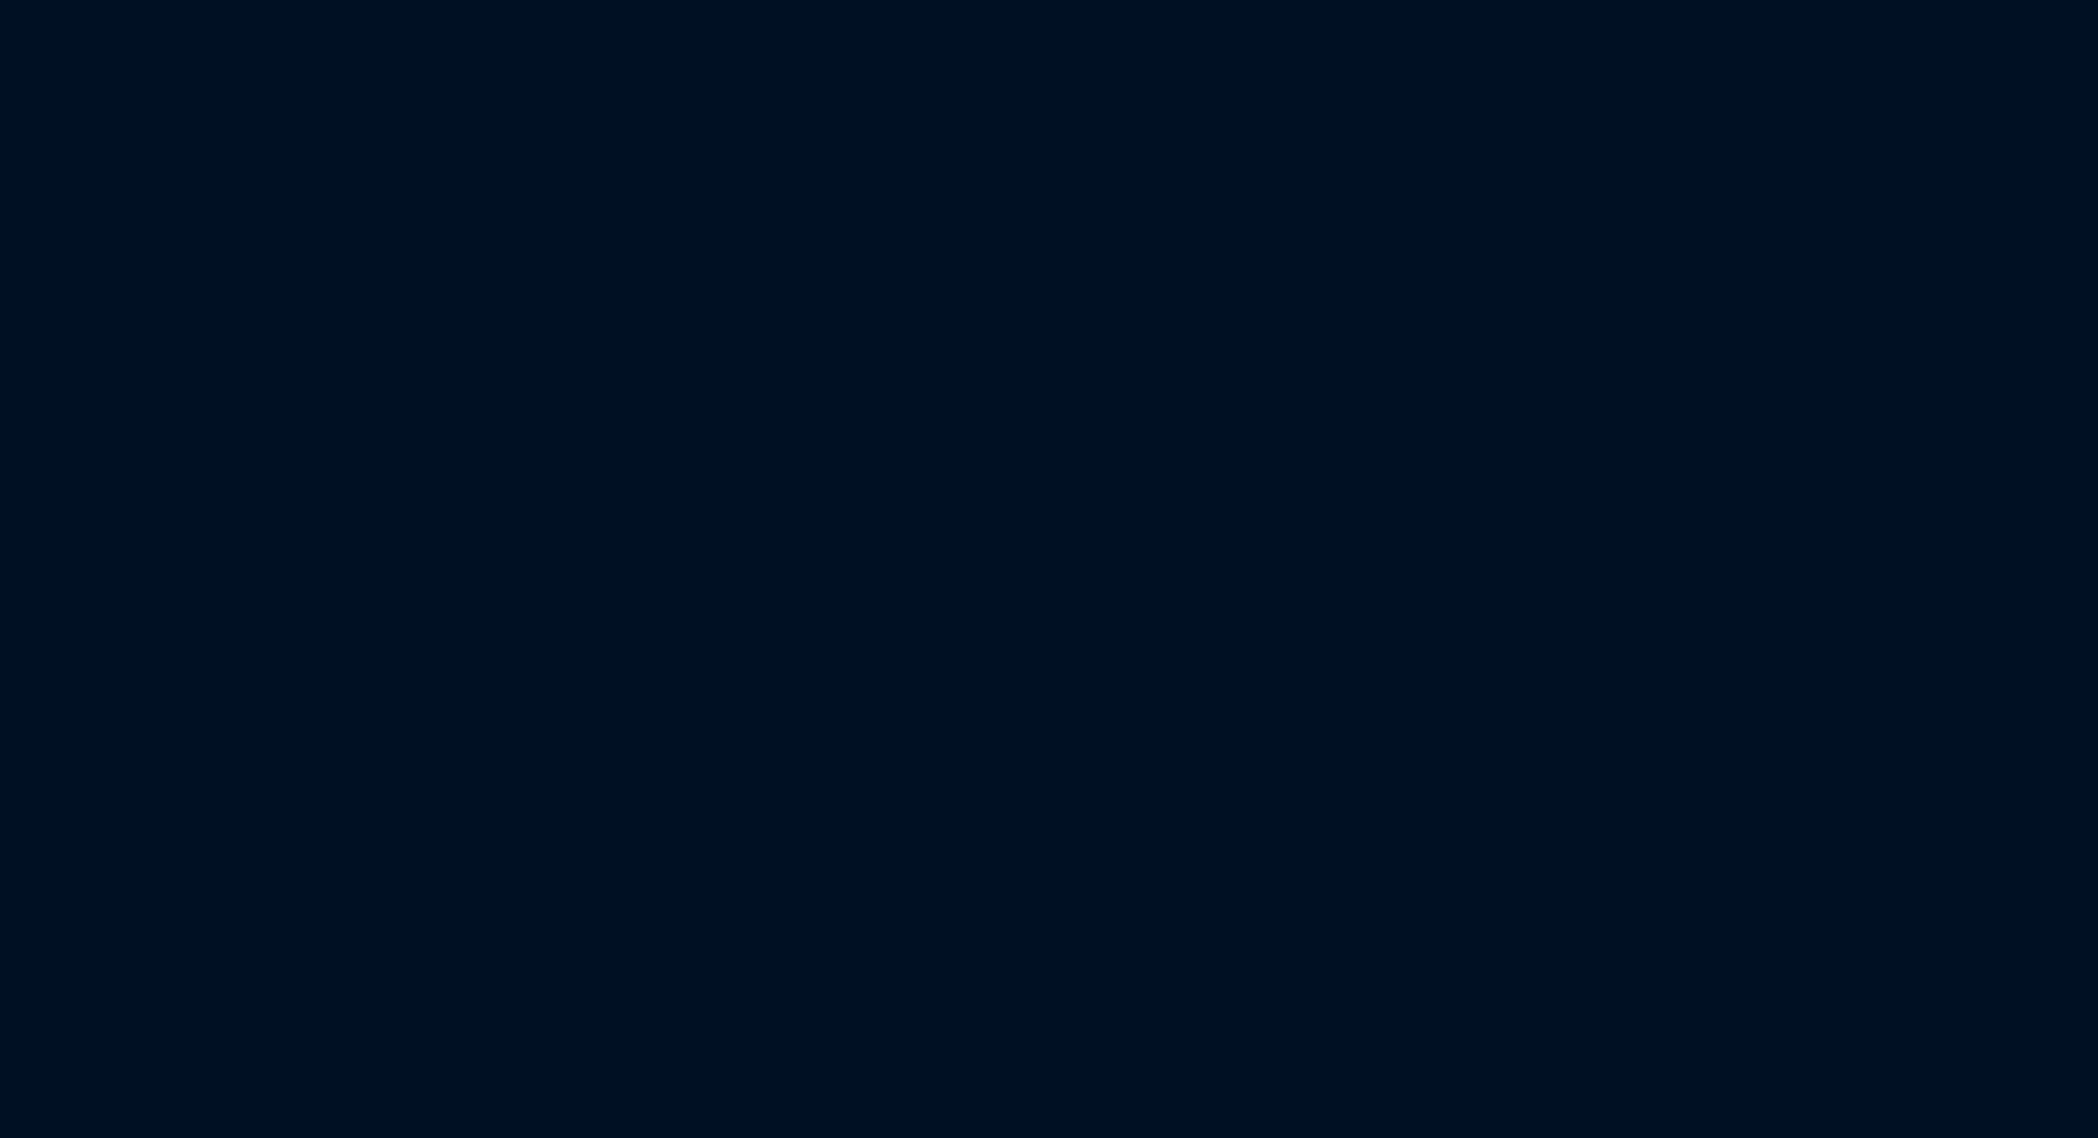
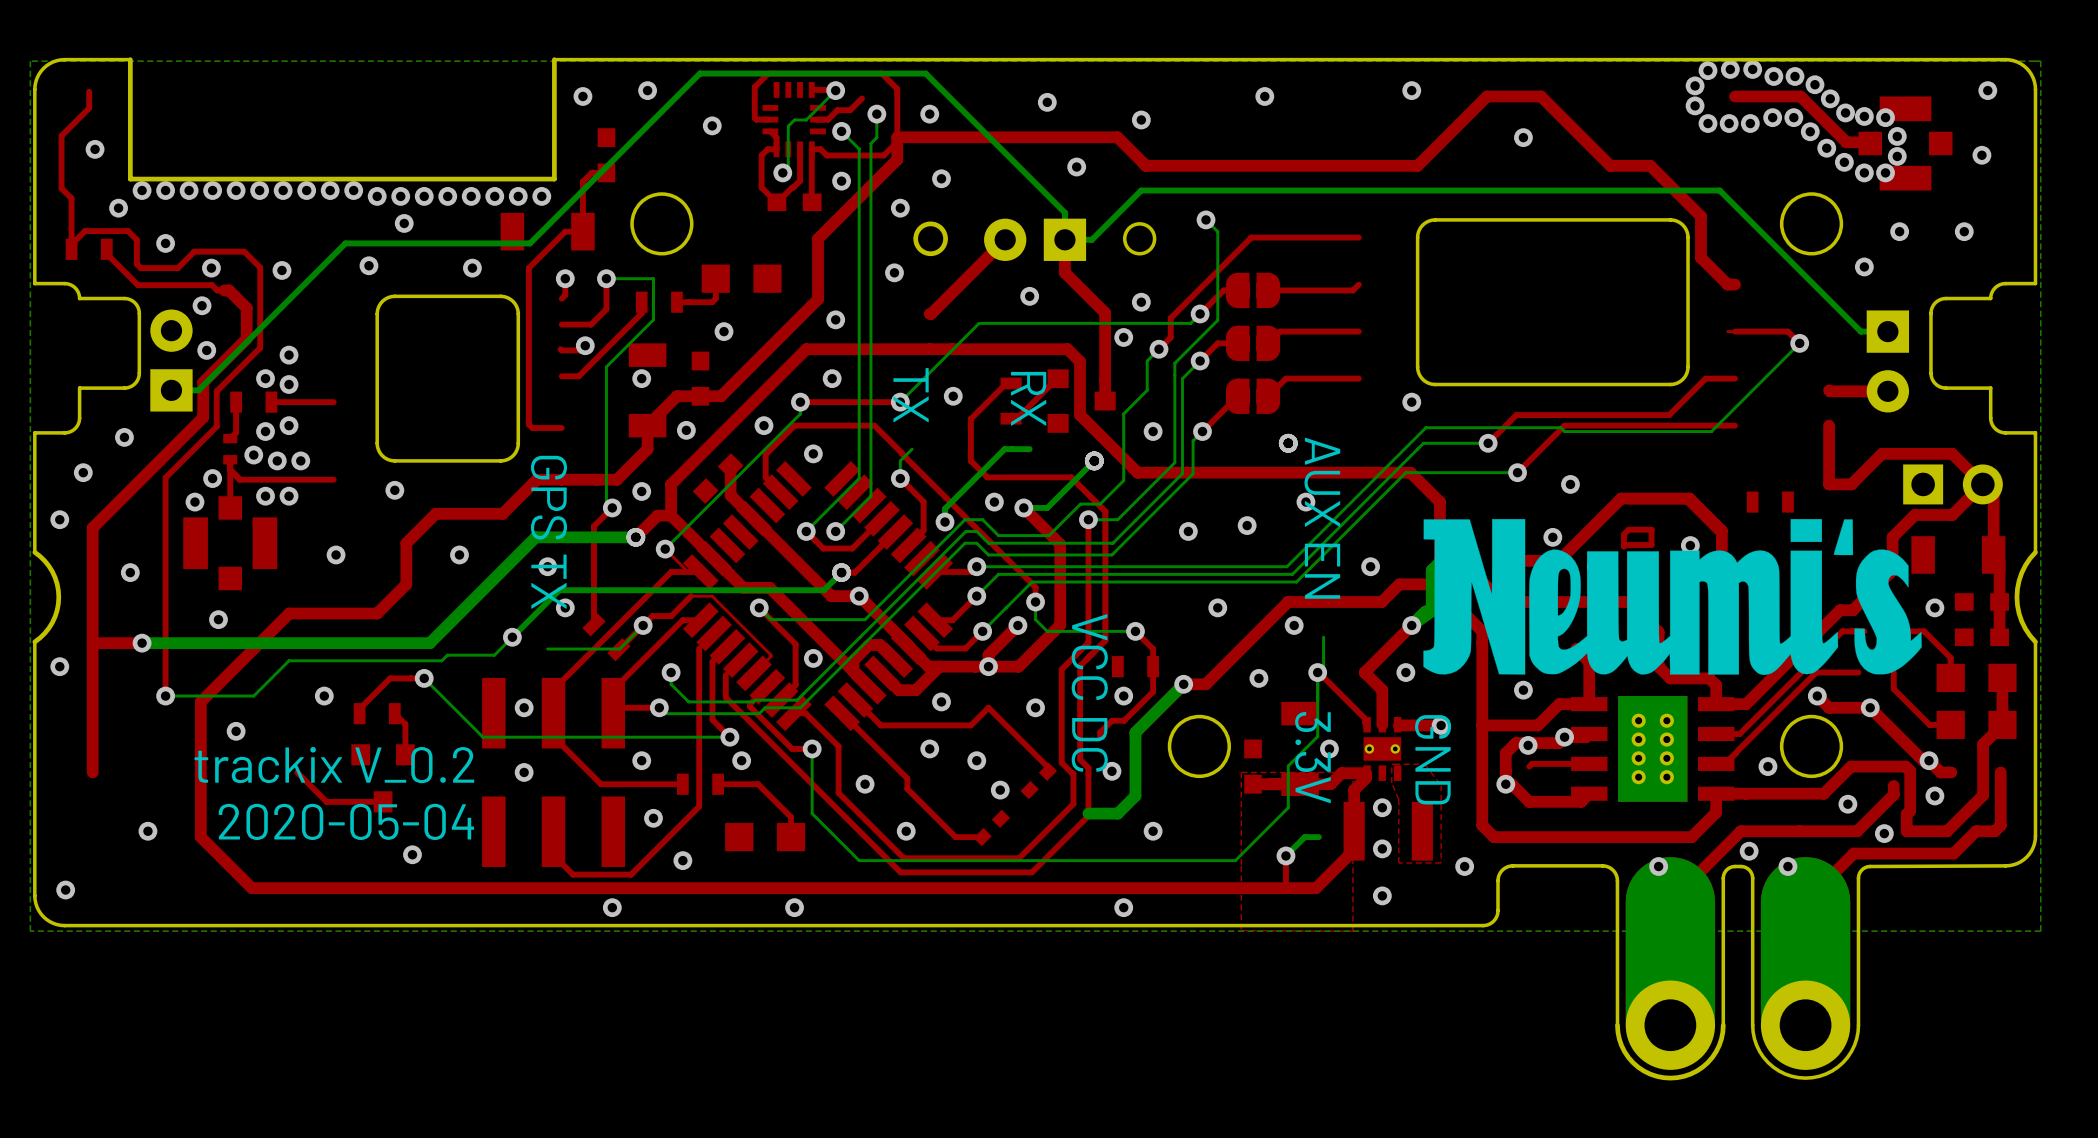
board edge: none -> (2005, 59) (554, 59) (554, 179) (130, 179) (130, 59) (64, 59) (53, 61) (40, 71) (35, 85) (34, 283) (68, 284) (76, 289) (79, 298) (124, 298) (133, 301) (139, 311) (139, 373) (136, 382) (128, 387) (79, 388) (79, 419) (76, 427) (72, 430) (64, 432) (34, 432) (34, 552) (44, 560) (52, 571) (57, 584) (58, 597) (57, 610) (52, 622) (44, 633) (34, 641) (34, 895) (37, 907) (46, 919) (56, 924) (64, 925) (1483, 925) (1490, 923) (1496, 916) (1498, 876) (1501, 871) (1507, 867) (1604, 866) (1613, 870) (1617, 878) (1617, 1025) (1619, 1038) (1628, 1057) (1638, 1067) (1656, 1076) (1670, 1078) (1684, 1076) (1702, 1067) (1712, 1057) (1719, 1045) (1723, 1025) (1723, 876) (1729, 868) (1742, 866) (1749, 869) (1752, 876) (1752, 1025) (1756, 1045) (1768, 1062) (1785, 1074) (1805, 1078) (1825, 1074) (1837, 1067) (1847, 1057) (1854, 1045) (1858, 1032) (1858, 878) (1861, 869) (1870, 866) (2009, 865) (2020, 861) (2026, 857) (2033, 847) (2035, 839) (2035, 641) (2021, 621) (2016, 597) (2021, 572) (2035, 552) (2035, 432) (2005, 432) (1998, 430) (1992, 425) (1990, 419) (1990, 388) (1942, 387) (1934, 382) (1930, 373) (1931, 311) (1936, 301) (1945, 298) (1990, 298) (1993, 289) (2001, 284) (2035, 283) (2035, 85) (2031, 74) (2026, 68) (2017, 61) (2005, 59)
bottom zone outline: none -> (2040, 61) (30, 61) (30, 931) (2040, 931) (2040, 61)
via: none -> (1730, 69)
via: none -> (1752, 69)
via: none -> (1708, 70)
via: none -> (1773, 76)
via: none -> (1795, 76)
via: none -> (1814, 84)
via: none -> (1695, 85)
top track: none -> (811, 89) (835, 90)
via: none -> (647, 90)
bottom track: none -> (835, 90) (806, 119) (794, 119) (788, 126) (788, 172)
via: none -> (835, 90)
via: none -> (1411, 90)
via: none -> (1987, 90)
top track: none -> (89, 91) (89, 108) (61, 135) (61, 188) (71, 198) (71, 249)
via: none -> (582, 96)
via: none -> (1264, 96)
top track: none -> (1764, 96) (1735, 96) (1800, 96) (1846, 142) (1870, 143)
top track: none -> (862, 98) (850, 110) (837, 110) (828, 119) (817, 119)
via: none -> (1830, 98)
via: none -> (1047, 102)
via: none -> (1695, 105)
via: none -> (1845, 112)
bottom track: none -> (876, 114) (876, 137) (870, 143) (870, 496) (835, 531)
via: none -> (876, 114)
via: none -> (929, 114)
via: none -> (1864, 116)
via: none -> (1772, 117)
via: none -> (1793, 117)
via: none -> (1885, 117)
top track: none -> (770, 119) (756, 119) (754, 117) (754, 87) (768, 73) (881, 73) (897, 89) (897, 141) (883, 155) (826, 155) (820, 149) (811, 149) (811, 202)
part: none -> (794, 119)
via: none -> (1141, 119)
via: none -> (1708, 123)
via: none -> (1729, 123)
via: none -> (1750, 123)
via: none -> (712, 125)
top track: none -> (770, 131) (776, 137) (776, 149) (767, 149) (761, 155) (761, 187) (776, 202) (800, 180) (800, 149)
bottom track: none -> (841, 131) (859, 149) (859, 478) (806, 531)
via: none -> (841, 131)
via: none -> (1810, 131)
via: none -> (1897, 136)
top track: none -> (1117, 137) (1146, 165) (1417, 165) (1486, 96) (1541, 96) (1610, 165) (1650, 165) (1700, 216) (1700, 257) (1727, 284) (1735, 284)
top track: none -> (1117, 137) (897, 137) (897, 159) (818, 238) (818, 299) (721, 396) (676, 396) (647, 425) (647, 449) (617, 479) (536, 479) (502, 513) (435, 513) (406, 543) (406, 584) (377, 613) (289, 613) (200, 701) (200, 837) (251, 888) (1316, 888) (1354, 850) (1354, 790) (1365, 778) (1365, 773) (1341, 773) (1330, 784) (1253, 784)
via: none -> (1523, 137)
part: none -> (1905, 143)
via: none -> (1826, 148)
via: none -> (95, 149)
part: none -> (606, 155)
via: none -> (1981, 155)
via: none -> (1897, 156)
via: none -> (1844, 162)
via: none -> (1076, 167)
top track: none -> (606, 172) (591, 172) (582, 181) (582, 231) (565, 231) (528, 268) (528, 424) (532, 428) (561, 428)
via: none -> (782, 172)
via: none -> (1864, 172)
via: none -> (1885, 172)
via: none -> (941, 178)
via: none -> (841, 181)
via: none -> (142, 190)
via: none -> (165, 190)
via: none -> (189, 190)
via: none -> (212, 190)
via: none -> (236, 190)
via: none -> (259, 190)
via: none -> (283, 190)
via: none -> (306, 190)
via: none -> (330, 190)
via: none -> (353, 190)
round board edge: none -> [630, 192, 694, 256]
round board edge: none -> [1779, 192, 1844, 256]
via: none -> (377, 196)
via: none -> (400, 196)
via: none -> (424, 196)
via: none -> (447, 196)
via: none -> (471, 196)
via: none -> (494, 196)
via: none -> (518, 196)
via: none -> (541, 196)
part: none -> (794, 202)
via: none -> (118, 208)
via: none -> (900, 208)
bottom track: none -> (1206, 219) (1217, 231) (1217, 320) (1174, 363) (1174, 462) (1117, 519) (1088, 519)
via: none -> (1206, 219)
board edge: none -> (1670, 219) (1435, 219) (1426, 222) (1419, 228) (1417, 237) (1417, 366) (1419, 375) (1426, 382) (1435, 384) (1670, 384) (1679, 382) (1685, 375) (1688, 366) (1688, 237) (1682, 225) (1670, 219)
round board edge: none -> [913, 221, 948, 257]
round board edge: none -> [1122, 222, 1157, 256]
via: none -> (404, 223)
part: none -> (547, 231)
via: none -> (1899, 231)
via: none -> (1964, 231)
top track: none -> (1358, 237) (1251, 237) (1170, 318) (1170, 337) (1158, 349)
top track: none -> (1005, 239) (929, 313)
part: none -> (1035, 239)
top track: none -> (1064, 239) (1064, 272) (1105, 312) (1105, 401)
via: none -> (165, 243)
top track: none -> (71, 244) (85, 231) (128, 231) (136, 239) (136, 264) (140, 268) (177, 268) (194, 251) (244, 251) (260, 267) (260, 347) (216, 391) (216, 426) (165, 477) (165, 696)
part: none -> (89, 249)
top track: none -> (106, 249) (106, 254) (137, 285) (212, 285) (217, 290) (229, 290) (246, 308) (246, 338) (203, 382) (203, 417) (92, 527) (92, 772)
via: none -> (368, 265)
via: none -> (1864, 266)
via: none -> (211, 268)
via: none -> (472, 268)
via: none -> (281, 270)
via: none -> (894, 272)
top track: none -> (565, 278) (565, 295) (561, 298)
via: none -> (565, 278)
top track: none -> (606, 278) (606, 309) (591, 324) (561, 324)
bottom track: none -> (606, 278) (653, 278) (653, 319) (606, 366) (606, 502) (612, 507)
via: none -> (606, 278)
top track: none -> (715, 278) (715, 298) (712, 302) (676, 302)
part: none -> (741, 278)
top track: none -> (1358, 284) (1352, 290) (1268, 290)
top track: none -> (1237, 290) (1223, 290) (1200, 313)
part: none -> (1253, 290)
board edge: none -> (500, 296) (394, 296) (388, 297) (380, 303) (377, 313) (377, 443) (379, 452) (384, 457) (394, 460) (500, 460) (507, 459) (514, 454) (518, 443) (518, 311) (511, 299) (500, 296)
via: none -> (1029, 296)
top track: none -> (641, 302) (641, 313) (578, 376) (561, 376)
part: none -> (659, 302)
via: none -> (1141, 302)
via: none -> (202, 305)
bottom track: none -> (1200, 313) (1190, 323) (979, 323) (900, 402)
via: none -> (1200, 313)
via: none -> (835, 319)
via: none -> (724, 331)
top track: none -> (1358, 331) (1280, 331) (1268, 343)
top track: none -> (1727, 331) (1787, 331) (1799, 343)
bottom track: none -> (1887, 331) (1860, 331) (1719, 190) (1141, 190) (1091, 239) (1064, 239) (1064, 212) (925, 73) (699, 73) (530, 243) (345, 243) (198, 390) (171, 390)
via: none -> (1123, 337)
top track: none -> (1237, 343) (1217, 343) (1200, 360)
part: none -> (1253, 343)
bottom track: none -> (1799, 343) (1711, 431) (1564, 431) (1560, 427) (1425, 427) (1286, 566) (976, 566)
via: none -> (1799, 343)
top track: none -> (585, 345) (580, 350) (560, 349)
via: none -> (585, 345)
bottom track: none -> (1158, 349) (1147, 360) (1147, 390) (1123, 413) (1123, 480) (1100, 504) (1080, 504) (1049, 535) (998, 535) (982, 519) (965, 519) (865, 619) (771, 619) (759, 607)
via: none -> (1158, 349)
via: none -> (206, 350)
via: none -> (289, 355)
part: none -> (171, 360)
bottom track: none -> (1200, 360) (1182, 378) (1182, 473) (1112, 543) (988, 543) (976, 531) (965, 531) (797, 700) (688, 701) (671, 684) (671, 672)
via: none -> (1200, 360)
part: none -> (1887, 361)
via: none -> (265, 378)
via: none -> (641, 378)
part: none -> (700, 378)
via: none -> (832, 378)
top track: none -> (1058, 378) (1016, 418) (1011, 418)
top track: none -> (1358, 378) (1285, 378) (1268, 396)
top track: none -> (1735, 378) (1705, 378) (1669, 415) (1516, 415) (1488, 443)
top track: none -> (1011, 383) (1006, 383) (970, 418) (970, 460) (987, 477)
via: none -> (289, 384)
part: none -> (647, 390)
top track: none -> (1829, 390) (1887, 391)
text: none -> TX (911, 395)
via: none -> (953, 396)
top track: none -> (1237, 396) (1202, 431)
part: none -> (1253, 396)
text: none -> RX (1028, 398)
part: none -> (1011, 401)
part: none -> (1081, 401)
top track: none -> (236, 402) (236, 432) (230, 438)
part: none -> (253, 402)
top track: none -> (333, 402) (271, 402)
bottom track: none -> (800, 402) (800, 413) (665, 549)
via: none -> (800, 402)
top track: none -> (900, 402) (800, 402)
via: none -> (900, 402)
via: none -> (1411, 402)
via: none -> (289, 425)
via: none -> (763, 425)
top track: none -> (1735, 425) (1564, 425) (1517, 472)
top track: none -> (1829, 425) (1829, 484) (1851, 484) (1881, 453) (1952, 453) (1993, 495) (1993, 554) (1999, 560) (1999, 637)
via: none -> (686, 430)
via: none -> (265, 431)
via: none -> (1153, 431)
bottom track: none -> (1202, 431) (1193, 440) (1193, 473) (1111, 554) (988, 554) (976, 543) (965, 543) (800, 707) (765, 707) (759, 713) (665, 713) (659, 707)
via: none -> (1202, 431)
via: none -> (124, 437)
via: none -> (1288, 443)
bottom track: none -> (1488, 443) (1423, 443) (1292, 574) (998, 574) (976, 596)
via: none -> (1488, 443)
part: none -> (230, 449)
bottom track: none -> (912, 449) (900, 460) (900, 478)
bottom track: none -> (1029, 449) (1004, 449) (945, 508) (945, 522)
via: none -> (813, 453)
via: none -> (253, 455)
top track: none -> (230, 459) (230, 507) (230, 459)
via: none -> (277, 460)
via: none -> (300, 460)
bottom track: none -> (1094, 460) (1047, 507) (1023, 507)
via: none -> (1094, 460)
top track: none -> (730, 466) (730, 495) (831, 596) (859, 596) (928, 666) (1018, 666) (1060, 625) (1060, 544) (1023, 507)
top track: none -> (230, 467) (242, 479) (333, 479) (239, 479) (230, 470)
via: none -> (83, 472)
bottom track: none -> (1517, 472) (1405, 472) (1296, 582) (1032, 582) (982, 631)
via: none -> (1517, 472)
top track: none -> (987, 477) (1071, 477) (1105, 511) (1105, 640) (1080, 665)
via: none -> (212, 478)
part: none -> (718, 478)
top track: none -> (900, 478) (923, 501) (923, 530) (908, 545)
via: none -> (900, 478)
via: none -> (1570, 484)
part: none -> (1953, 484)
top track: none -> (1982, 484) (1952, 515) (1914, 515) (1892, 537) (1892, 570) (1852, 610) (1840, 610) (1746, 704) (1716, 704) (1716, 685) (1709, 678) (1670, 678) (1658, 666) (1658, 631) (1628, 602) (1502, 602) (1461, 560) (1439, 560) (1439, 502) (1410, 472) (1137, 472) (1079, 414) (1079, 361) (1067, 349) (806, 349) (671, 484) (671, 515)
via: none -> (394, 490)
via: none -> (641, 491)
top track: none -> (780, 492) (765, 477) (765, 454) (794, 425) (874, 425) (1035, 587) (1035, 602)
via: none -> (265, 496)
via: none -> (289, 496)
top track: none -> (1628, 501) (1686, 501) (1721, 536) (1721, 550) (1721, 530) (1689, 498) (1621, 498) (1558, 560) (1512, 560)
via: none -> (194, 502)
via: none -> (994, 502)
via: none -> (1305, 502)
part: none -> (1770, 502)
via: none -> (612, 507)
via: none -> (1023, 507)
top track: none -> (612, 513) (612, 507) (593, 526) (593, 624)
top track: none -> (671, 515) (657, 515) (635, 537)
top track: none -> (671, 515) (743, 587) (769, 587) (868, 686)
top track: none -> (882, 518) (852, 548) (823, 548) (806, 531) (806, 537)
text: none -> AUX EN (1322, 518)
via: none -> (59, 519)
top track: none -> (1088, 519) (1088, 642) (1061, 669) (1061, 762) (1073, 773) (1073, 803) (1019, 858) (903, 858) (838, 793) (838, 746) (805, 713) (793, 713)
via: none -> (1088, 519)
drawing: none -> [1423, 519, 1922, 676]
via: none -> (945, 522)
via: none -> (1247, 525)
top track: none -> (1651, 529) (1628, 529) (1623, 534) (1623, 546) (1651, 544) (1651, 529)
via: none -> (806, 531)
via: none -> (835, 531)
via: none -> (1188, 531)
text: none -> GPS TX (548, 532)
top track: none -> (895, 532) (854, 572) (841, 572)
bottom track: none -> (635, 537) (535, 537) (429, 643) (142, 643)
via: none -> (635, 537)
via: none -> (1552, 537)
part: none -> (230, 543)
via: none -> (1690, 545)
top track: none -> (665, 549) (688, 572) (700, 572) (671, 572) (553, 689) (553, 736) (601, 784) (682, 784)
via: none -> (665, 549)
via: none -> (336, 554)
via: none -> (459, 554)
part: none -> (1958, 554)
bottom track: none -> (1441, 560) (1431, 570) (1431, 611) (1411, 625) (1425, 611)
via: none -> (547, 566)
top track: none -> (976, 566) (971, 572) (935, 572)
via: none -> (976, 566)
via: none -> (1370, 566)
via: none -> (130, 572)
bottom track: none -> (841, 572) (823, 590) (559, 590) (494, 655) (447, 655) (441, 660) (289, 660) (253, 696) (165, 696)
via: none -> (841, 572)
part: none -> (818, 596)
via: none -> (859, 596)
top track: none -> (970, 596) (976, 596) (952, 620) (935, 620)
via: none -> (976, 596)
bottom track: none -> (1035, 602) (1035, 619) (1047, 631) (1135, 631)
via: none -> (1035, 602)
part: none -> (1981, 602)
via: none -> (565, 607)
top track: none -> (759, 607) (795, 644) (795, 685) (780, 700)
via: none -> (759, 607)
via: none -> (1217, 607)
via: none -> (1934, 607)
via: none -> (218, 619)
top track: none -> (700, 620) (682, 620) (613, 689) (613, 713) (618, 707) (659, 707)
bottom track: none -> (643, 625) (619, 649) (547, 649)
via: none -> (643, 625)
top track: none -> (1017, 625) (988, 654) (988, 666)
via: none -> (1017, 625)
via: none -> (1294, 625)
top track: none -> (1411, 625) (1364, 672) (1382, 690) (1382, 724)
via: none -> (1411, 625)
top track: none -> (982, 631) (965, 648) (936, 648) (921, 633)
via: none -> (982, 631)
top track: none -> (1135, 631) (1153, 649) (1153, 691) (1124, 720) (1111, 720) (1100, 732) (1100, 737)
via: none -> (1135, 631)
top track: none -> (1864, 631) (1842, 631) (1739, 734) (1716, 734)
top track: none -> (1899, 631) (1924, 631) (1950, 657) (1950, 677)
via: none -> (512, 637)
part: none -> (606, 637)
bottom track: none -> (1323, 637) (1323, 666) (1317, 672) (1317, 736) (1288, 765) (1288, 807) (1235, 860) (859, 860) (812, 813) (812, 748)
part: none -> (1981, 637)
top track: none -> (142, 643) (92, 643)
via: none -> (142, 643)
top track: none -> (727, 646) (712, 661) (712, 719) (729, 737)
top track: none -> (699, 648) (699, 806) (631, 874) (572, 874) (553, 855) (553, 831)
top track: none -> (618, 649) (652, 616) (671, 616) (691, 596) (712, 596) (771, 655) (754, 673)
top track: none -> (1629, 649) (1576, 649) (1589, 661) (1589, 704) (1559, 704) (1538, 725) (1482, 725)
via: none -> (813, 658)
top track: none -> (740, 660) (725, 675) (725, 697) (900, 872) (1032, 872) (1088, 815) (1088, 767) (1080, 759) (1080, 665)
top track: none -> (895, 660) (880, 644) (868, 644) (853, 660) (853, 671)
via: none -> (59, 666)
top track: none -> (939, 666) (916, 690) (898, 690) (882, 673)
via: none -> (988, 666)
part: none -> (1135, 666)
via: none -> (671, 672)
top track: none -> (1317, 672) (1367, 720) (1367, 724) (1364, 722)
via: none -> (1317, 672)
via: none -> (1405, 672)
top track: none -> (1858, 672) (1816, 672) (1724, 763) (1716, 763) (1727, 763) (1737, 753) (1737, 749) (1814, 672) (1852, 672)
top track: none -> (1893, 672) (1893, 688) (1929, 724) (1950, 724)
part: none -> (1976, 677)
top track: none -> (2002, 677) (2002, 724) (1983, 744) (1983, 795) (1947, 831) (1906, 831) (1906, 814) (1910, 810) (1910, 771) (1905, 766) (1851, 766) (1823, 793) (1716, 793) (1716, 812) (1691, 837) (1494, 837) (1482, 825)
top track: none -> (424, 678) (390, 678) (359, 708) (359, 713)
bottom track: none -> (424, 678) (483, 737) (729, 737)
via: none -> (424, 678)
via: none -> (1258, 678)
bottom track: none -> (1183, 684) (1135, 732) (1135, 795) (1117, 813) (1088, 813)
via: none -> (1183, 684)
top track: none -> (767, 686) (749, 704) (749, 706) (792, 748) (812, 748)
via: none -> (1523, 690)
text: none -> VCC DC (1089, 692)
via: none -> (165, 696)
via: none -> (324, 696)
via: none -> (1123, 696)
top track: none -> (1817, 696) (1829, 707) (1870, 707) (1923, 760) (1929, 760) (1940, 772) (1951, 772)
via: none -> (1817, 696)
top track: none -> (855, 700) (880, 725) (970, 725) (988, 707) (1047, 767) (1047, 771)
via: none -> (941, 701)
via: none -> (524, 707)
via: none -> (659, 707)
via: none -> (1035, 707)
via: none -> (1870, 707)
part: none -> (377, 713)
top track: none -> (394, 713) (405, 724) (405, 754)
top track: none -> (842, 713) (907, 778) (907, 788) (955, 837) (982, 837)
round board edge: none -> [1167, 714, 1232, 779]
round board edge: none -> [1779, 714, 1844, 779]
part: none -> (1976, 724)
top track: none -> (1441, 725) (1398, 725)
via: none -> (1441, 725)
via: none -> (236, 731)
top track: none -> (1589, 734) (1586, 737) (1564, 737) (1558, 743) (1516, 743) (1505, 753) (1505, 784) (1511, 784) (1529, 801) (1581, 801) (1589, 793)
via: none -> (729, 737)
top track: none -> (1135, 737) (1135, 732) (1183, 684) (1205, 684) (1288, 602) (1381, 602) (1399, 584) (1435, 584) (1482, 631) (1482, 825)
via: none -> (1564, 737)
via: none -> (1528, 745)
via: none -> (812, 748)
via: none -> (929, 748)
part: none -> (1300, 748)
via: none -> (1329, 748)
part: none -> (1382, 748)
part: none -> (1652, 748)
text: none -> 3.3V (1312, 757)
text: none -> GND (1433, 759)
via: none -> (641, 760)
via: none -> (741, 760)
via: none -> (976, 760)
via: none -> (1929, 760)
top track: none -> (1589, 763) (1532, 763) (1529, 766)
top zone outline: none -> (1424, 764) (1391, 764) (1391, 783) (1398, 799) (1398, 862) (1441, 862) (1441, 785) (1424, 764)
text: none -> trackix V_0.2 (334, 765)
part: none -> (1253, 766)
via: none -> (1767, 766)
via: none -> (1111, 771)
top track: none -> (297, 772) (326, 801) (383, 801)
via: none -> (524, 772)
part: none -> (553, 772)
top zone outline: none -> (1352, 772) (1241, 772) (1241, 930) (1352, 931) (1352, 772)
top track: none -> (2000, 772) (2000, 825) (1994, 831) (1976, 831) (1953, 853) (1853, 853) (1805, 901)
part: none -> (383, 778)
part: none -> (1038, 780)
part: none -> (700, 784)
top track: none -> (718, 784) (758, 784) (791, 817) (791, 837) (782, 828)
via: none -> (865, 784)
via: none -> (1505, 784)
top track: none -> (1893, 785) (1893, 794) (1857, 831) (1740, 831) (1670, 901)
via: none -> (1000, 790)
via: none -> (1934, 795)
via: none -> (1847, 804)
via: none -> (1382, 807)
via: none -> (653, 818)
text: none -> 2020-05-04 (346, 821)
part: none -> (991, 827)
via: none -> (147, 831)
via: none -> (906, 831)
via: none -> (1153, 831)
part: none -> (1388, 831)
via: none -> (1884, 833)
part: none -> (765, 837)
bottom track: none -> (1318, 837) (1304, 837) (1285, 855)
via: none -> (1382, 848)
via: none -> (1749, 851)
via: none -> (412, 854)
top track: none -> (1285, 855) (1285, 888)
via: none -> (1285, 855)
via: none -> (682, 860)
via: none -> (1464, 866)
via: none -> (1658, 866)
via: none -> (1787, 866)
via: none -> (65, 890)
via: none -> (1382, 895)
bottom track: none -> (1670, 901) (1670, 925) (1670, 1019) (1670, 901)
bottom track: none -> (1805, 901) (1805, 925) (1805, 1019) (1805, 901)
via: none -> (612, 907)
via: none -> (794, 907)
via: none -> (1123, 907)
part: none -> (1670, 1025)
part: none -> (1805, 1025)

